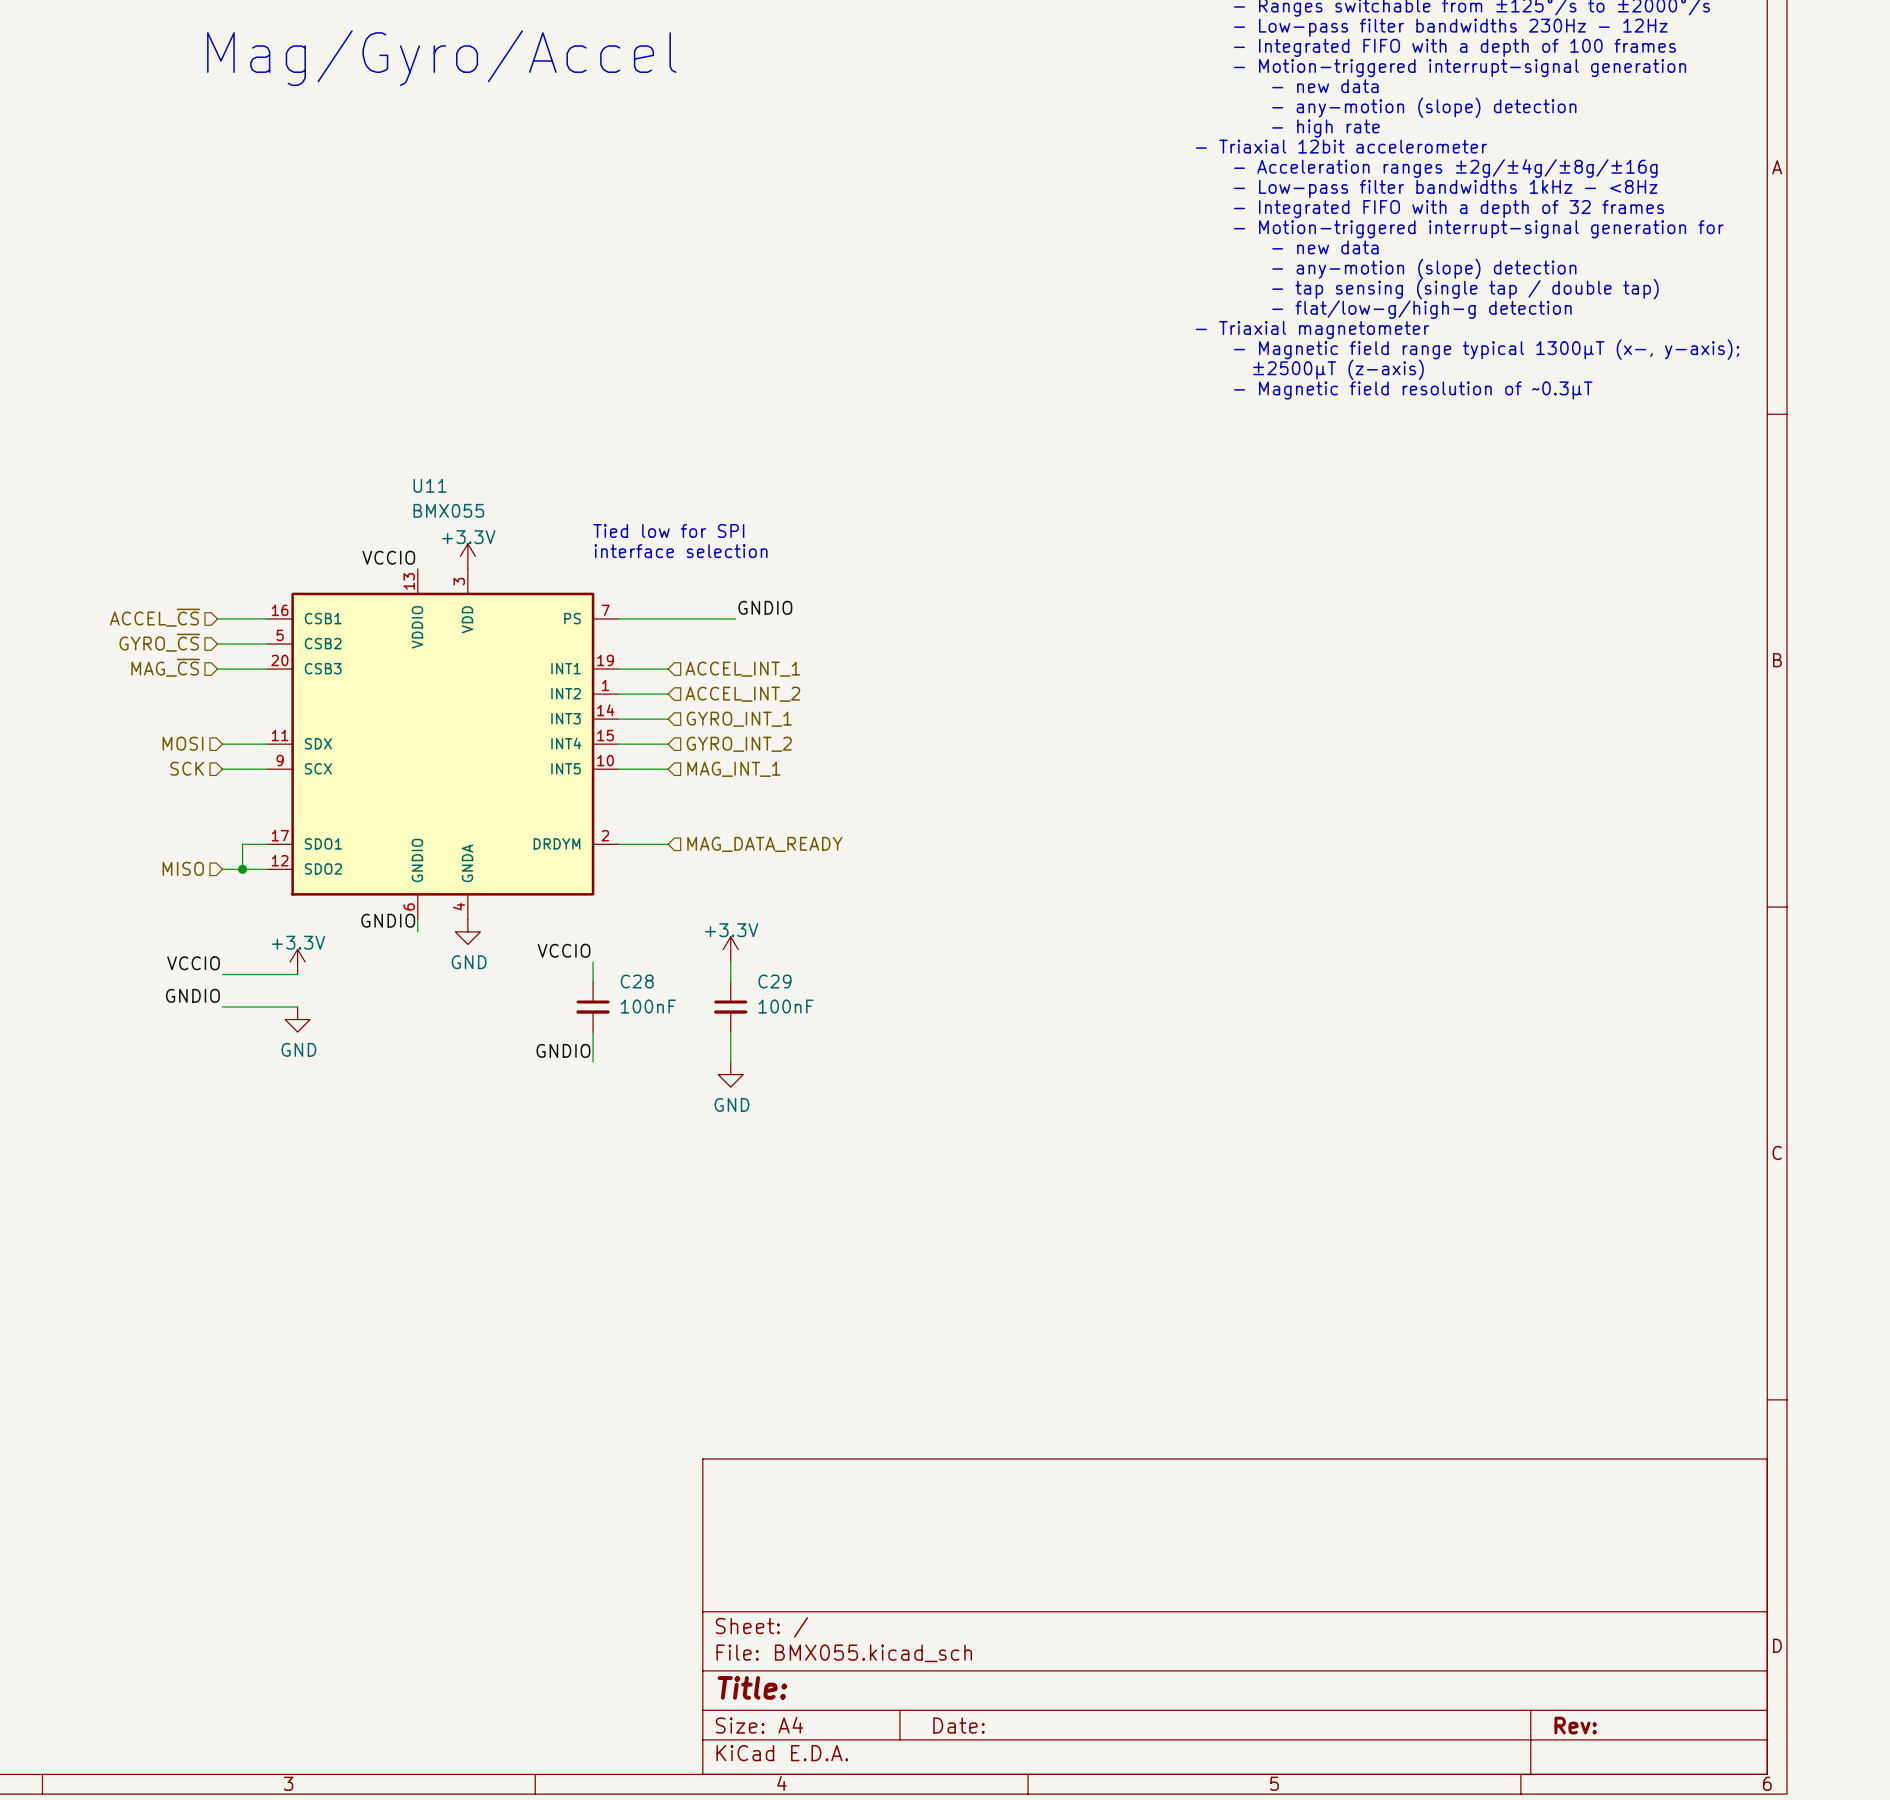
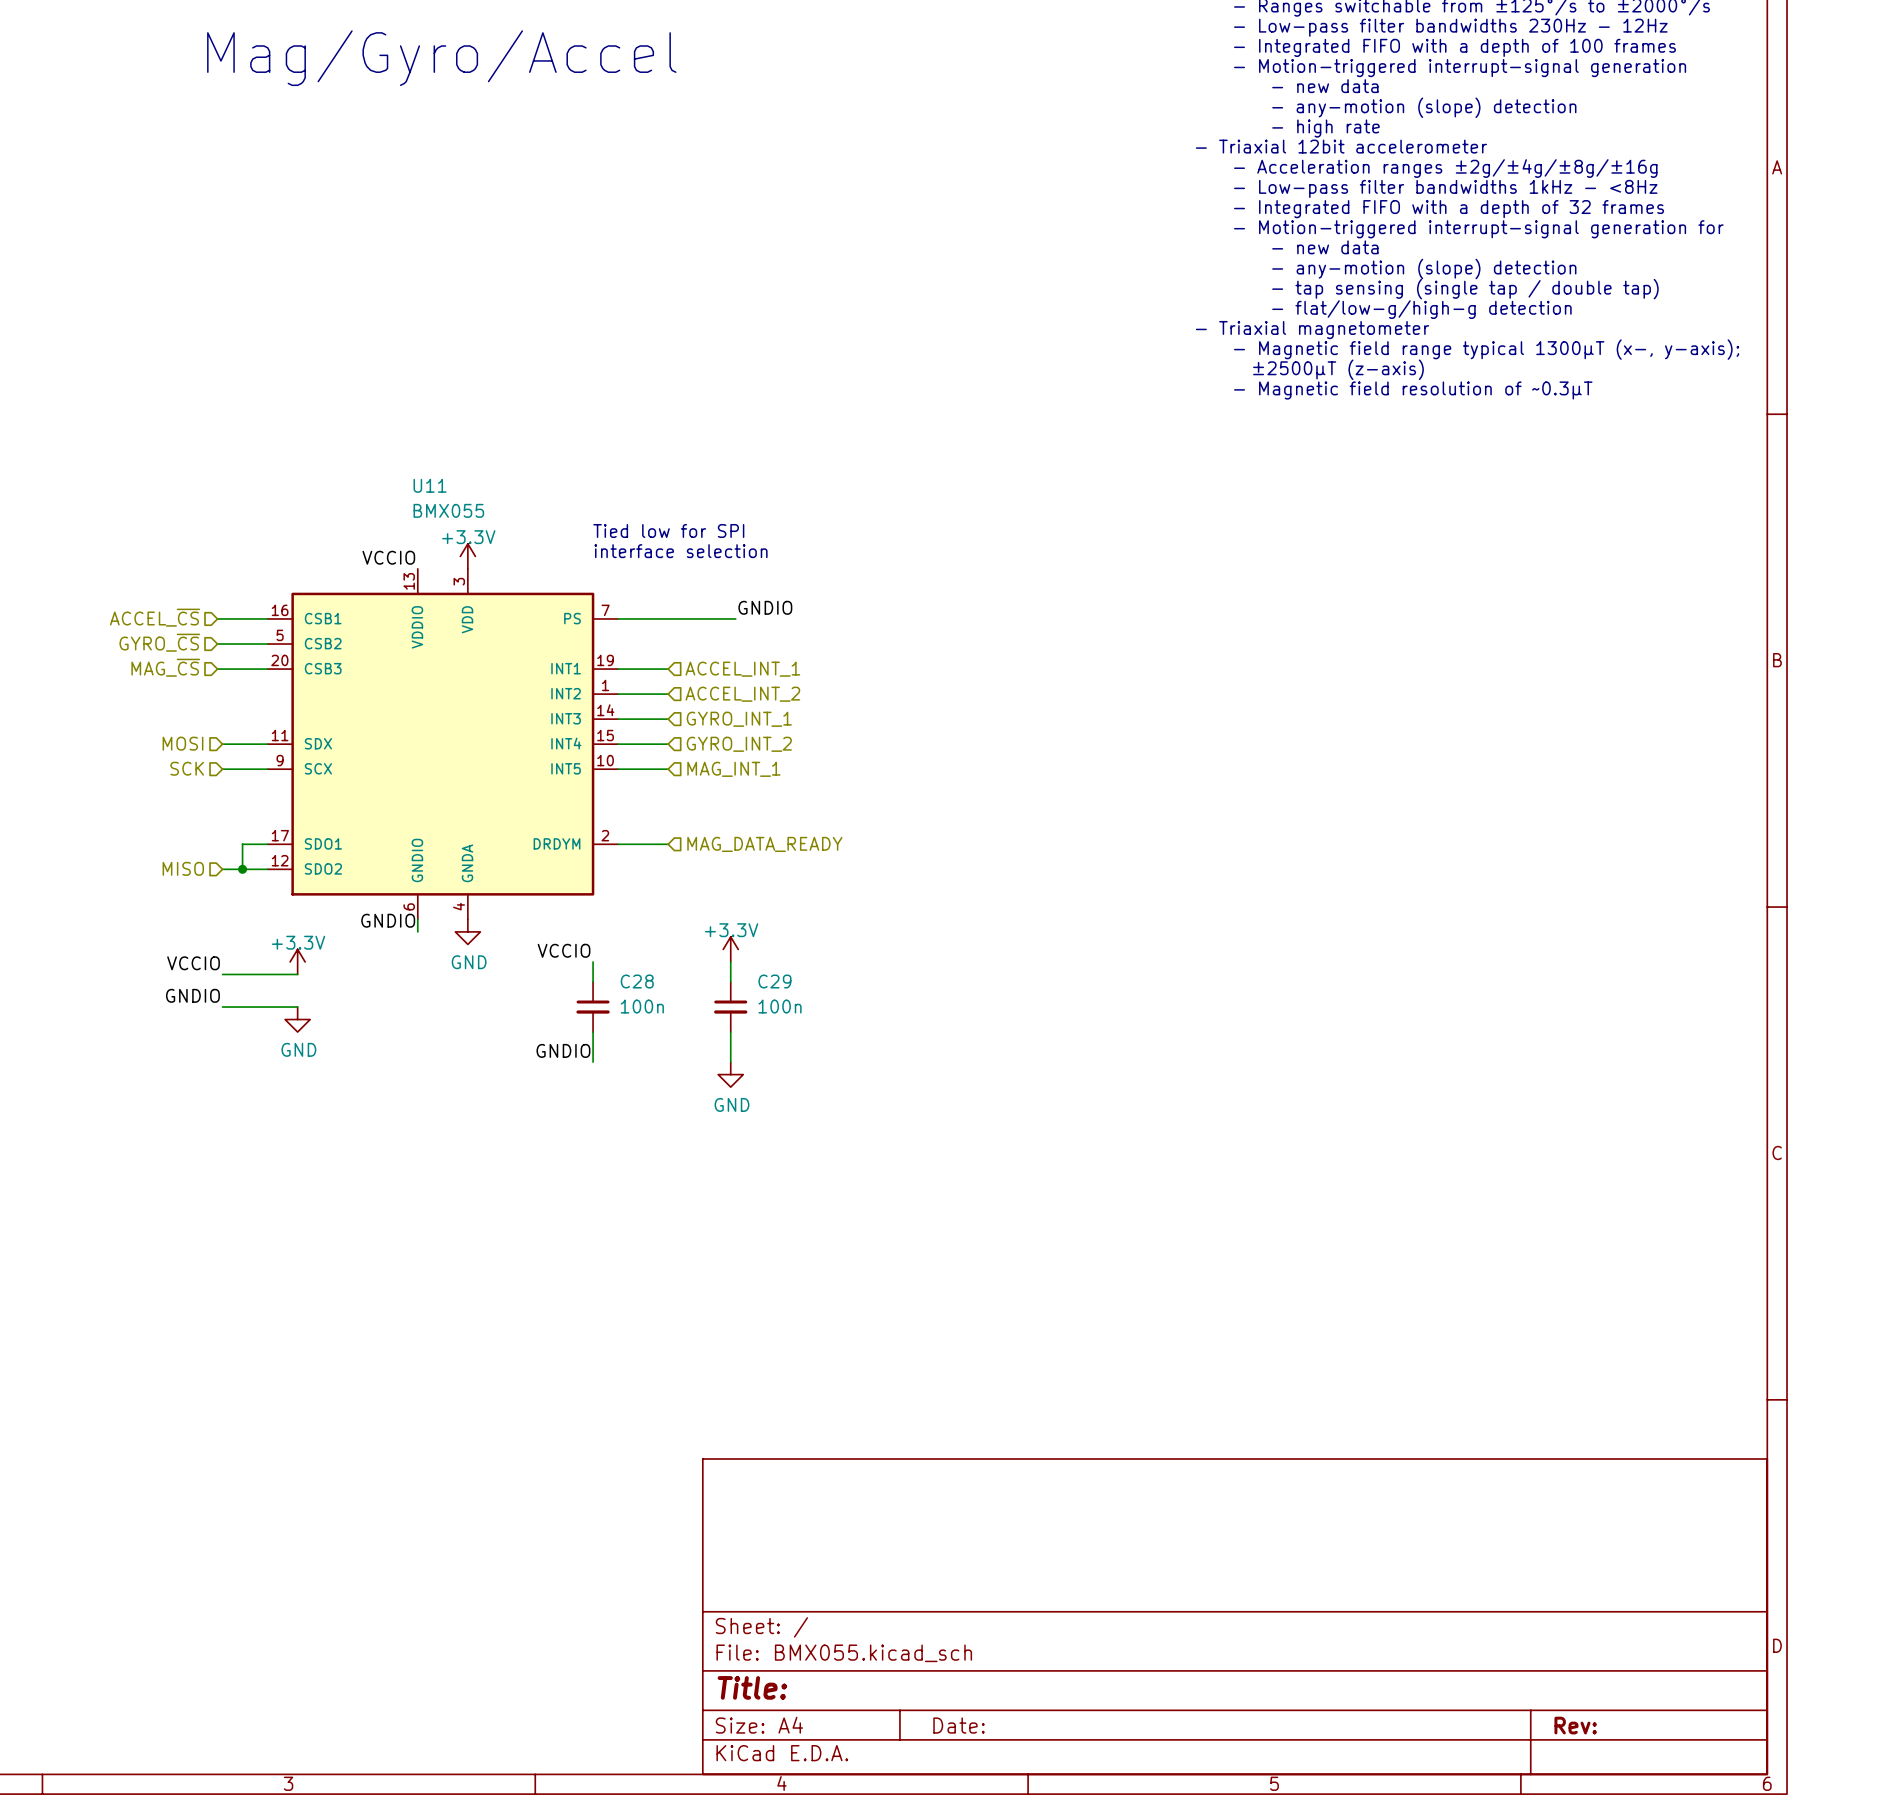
C28 value: 100nF (648, 1006) -> 100n (642, 1006)
C29 value: 100nF (785, 1006) -> 100n (780, 1006)

